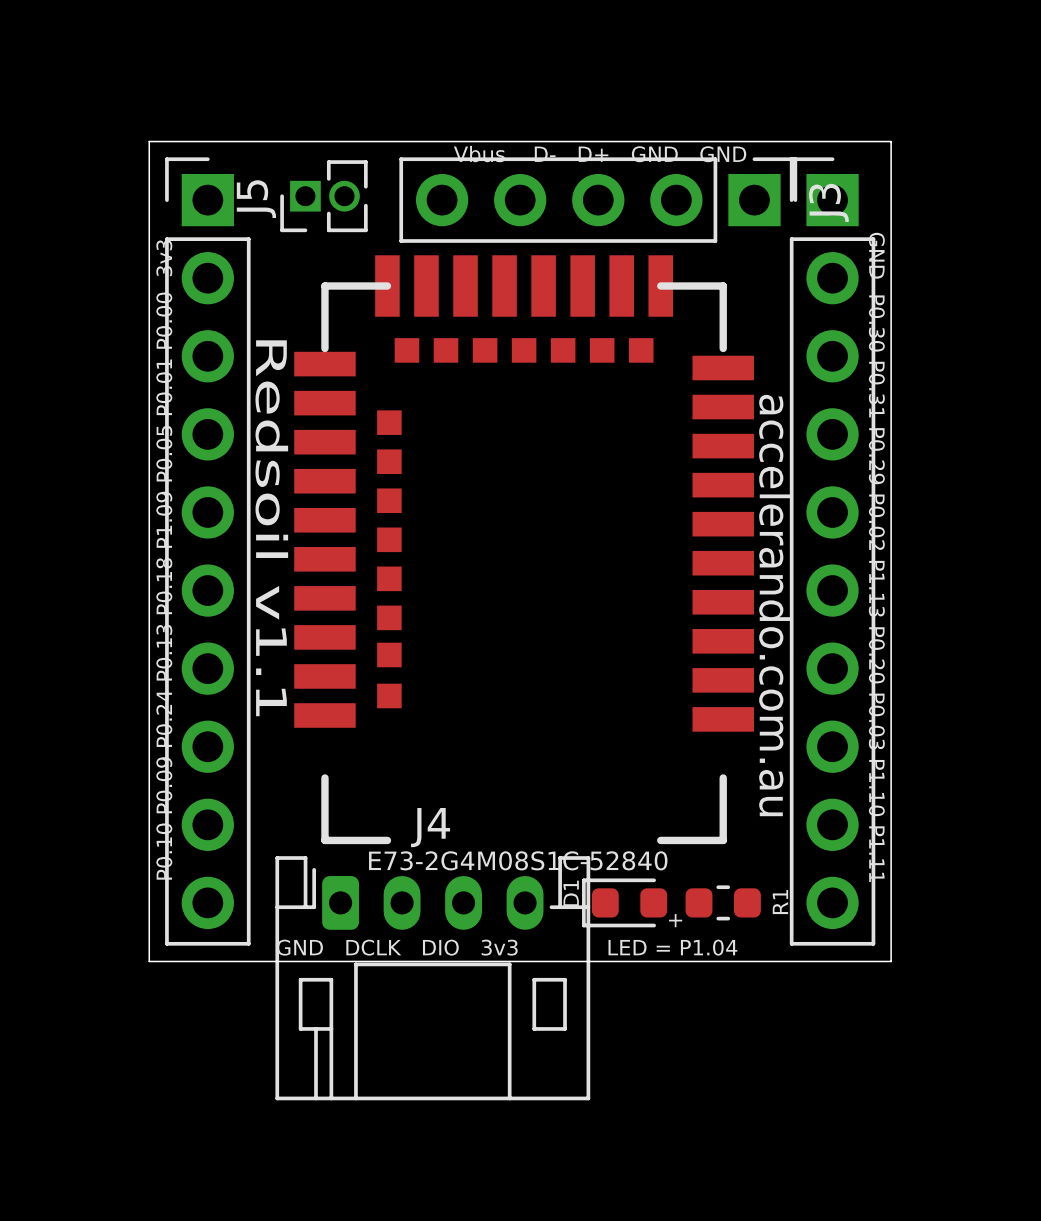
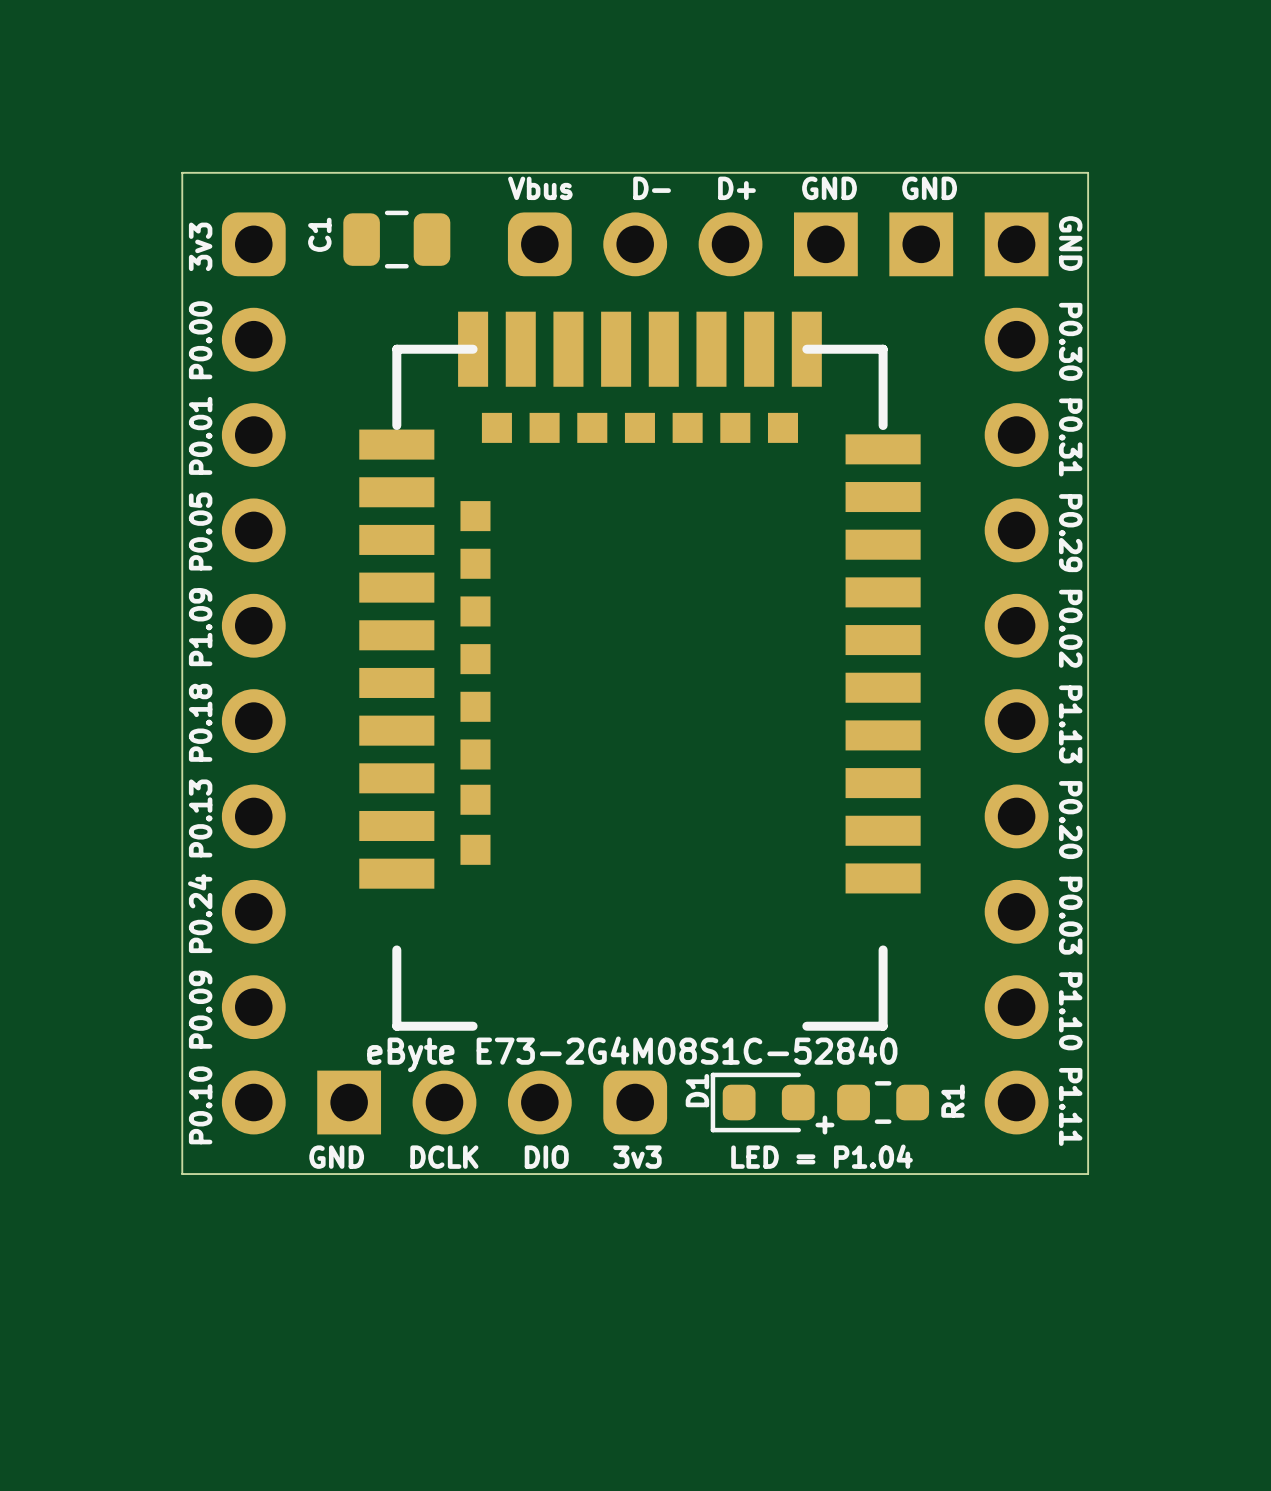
part footprint: [165, 157, 251, 946] -> [221, 212, 286, 1135]
part footprint: [789, 157, 876, 946] -> [984, 212, 1049, 1135]
J5: (323, 196) -> none
C1: none -> (396, 239)
J3: (598, 200) -> none
part: none -> (730, 244)
text: Redsoil v1.1 (271, 528) -> none
text: accelerando.com.au (775, 605) -> none
part value: E73-2G4M08S1C-52840 (518, 860) -> eByte E73-2G4M08S1C-52840 (632, 1054)
part: none -> (492, 1102)
J4: (432, 978) -> none

